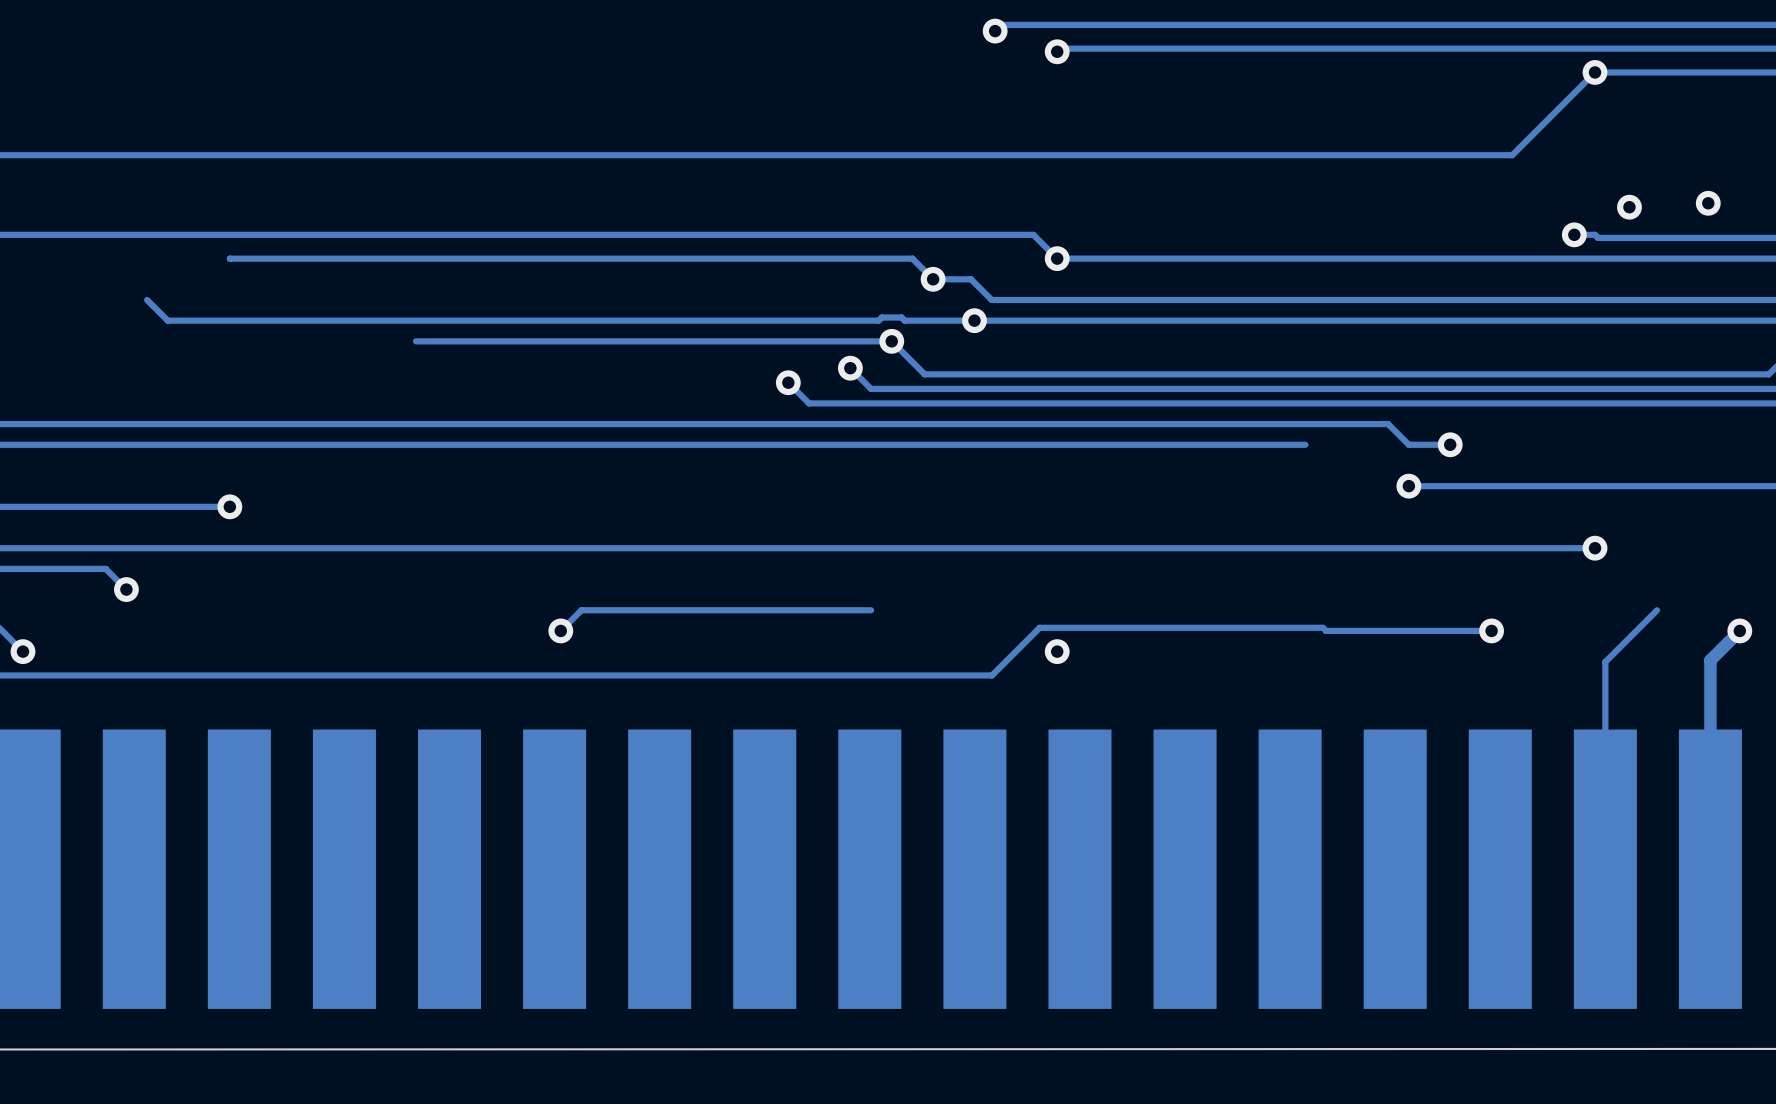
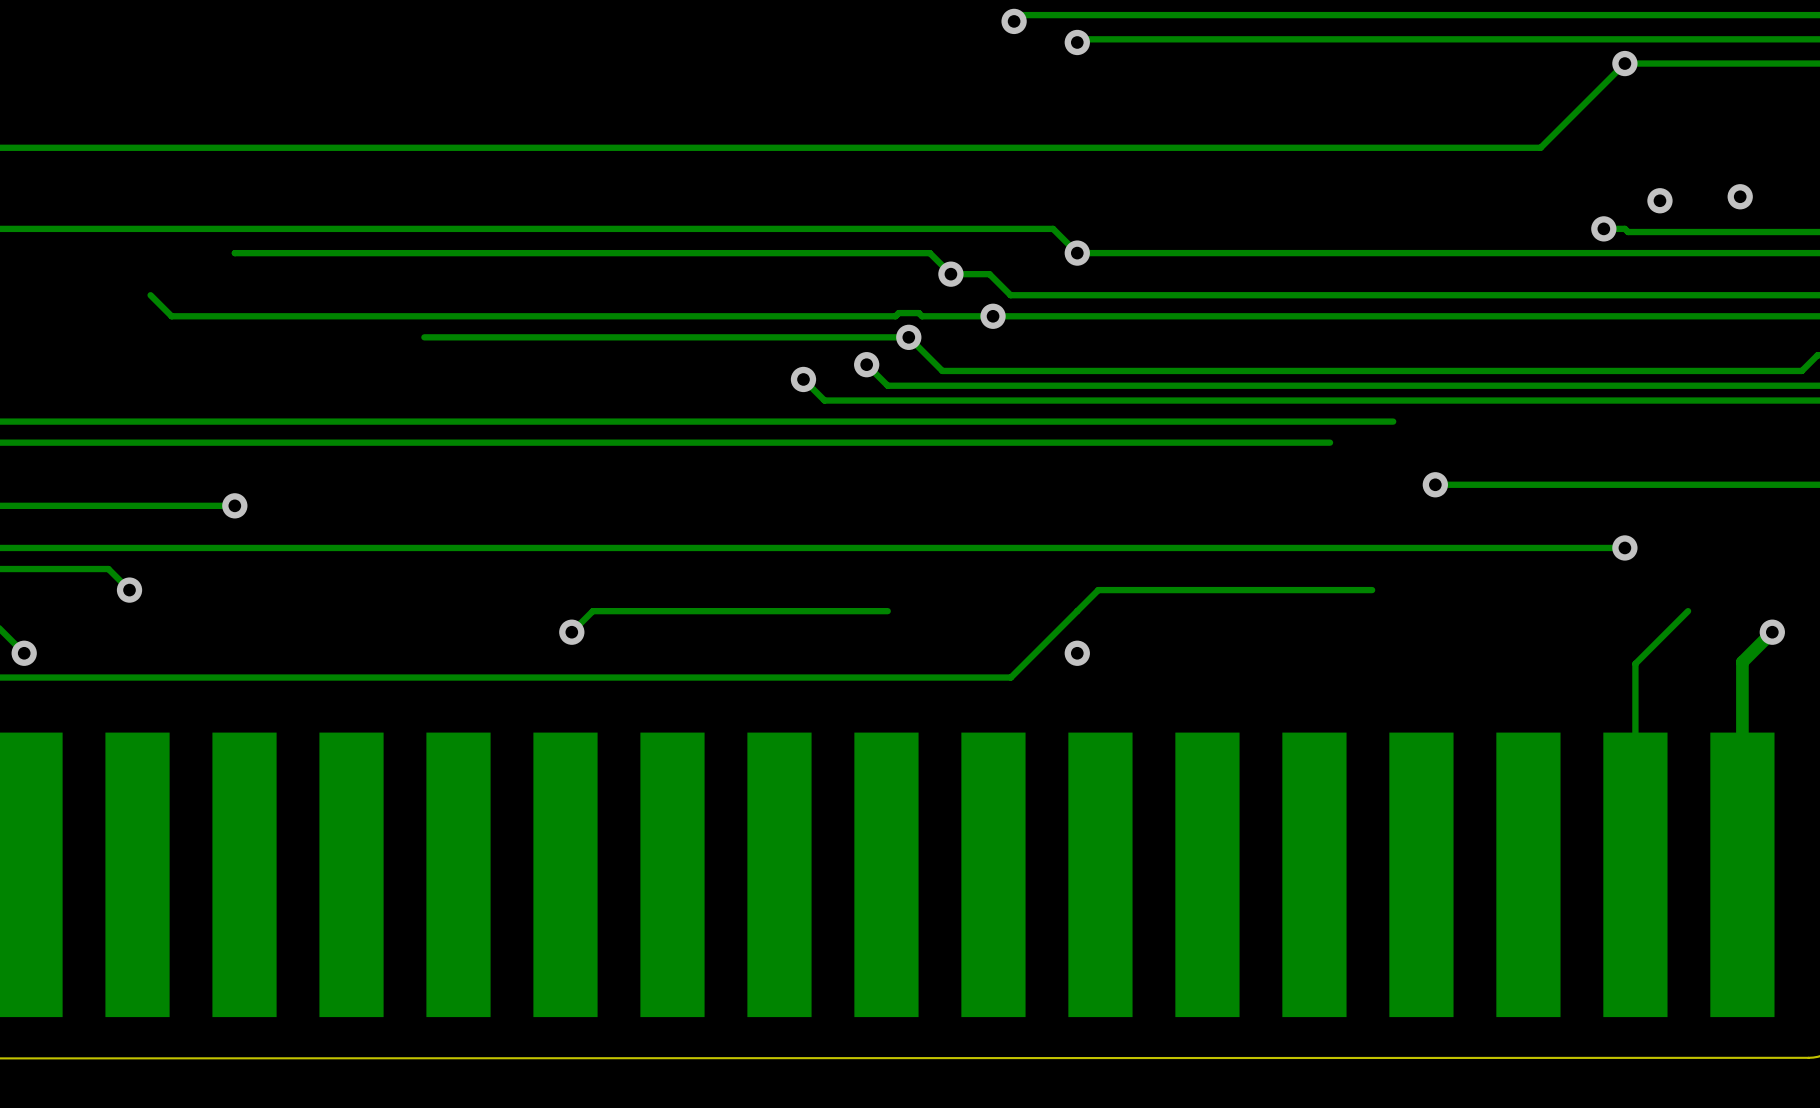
track: (1367, 424) (1388, 424) (1408, 444) (1450, 444) -> none
via: (1450, 444) -> none
track: (1039, 627) (1322, 627) (1326, 630) (1491, 630) -> (1059, 629) (1098, 590) (1372, 590)
via: (1491, 630) -> none

